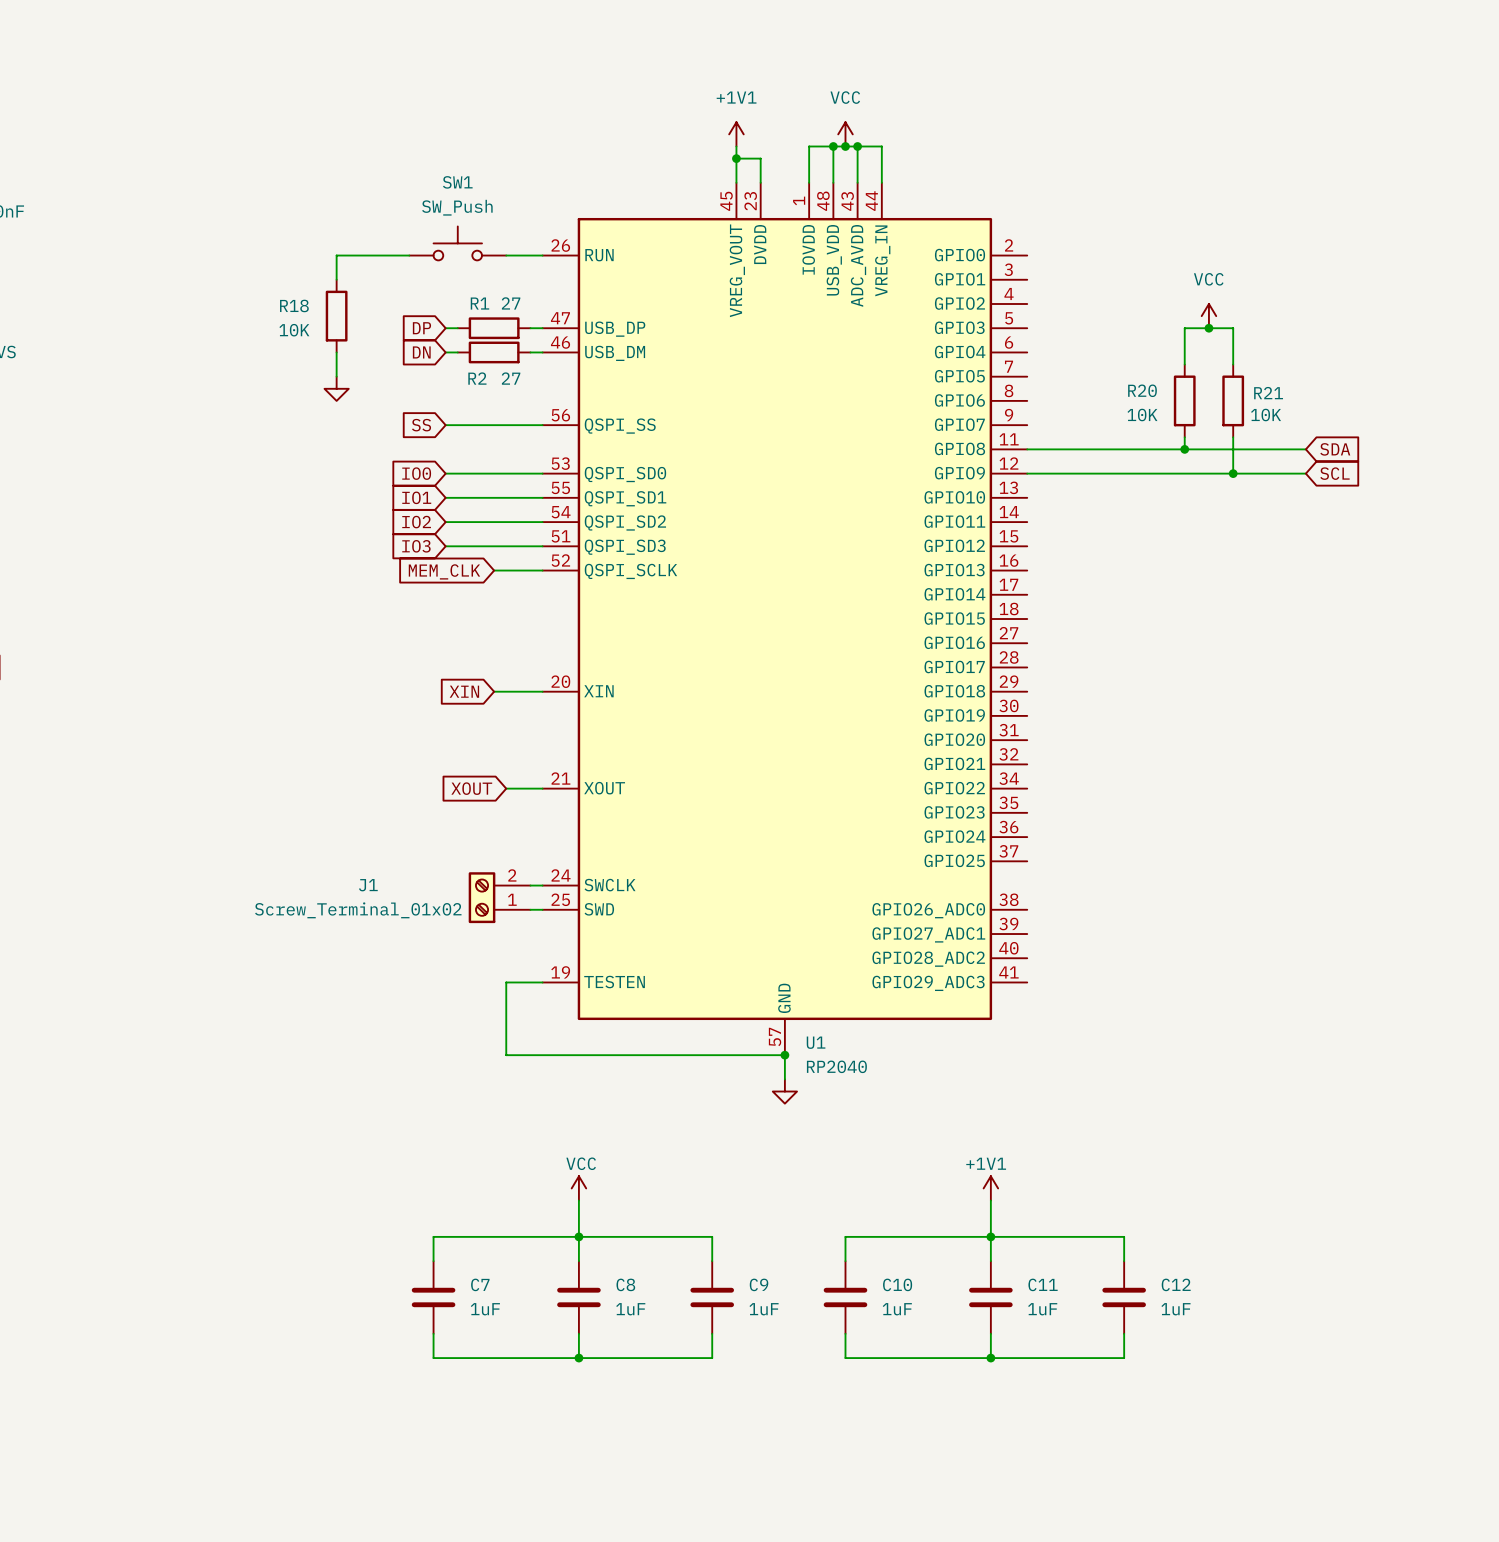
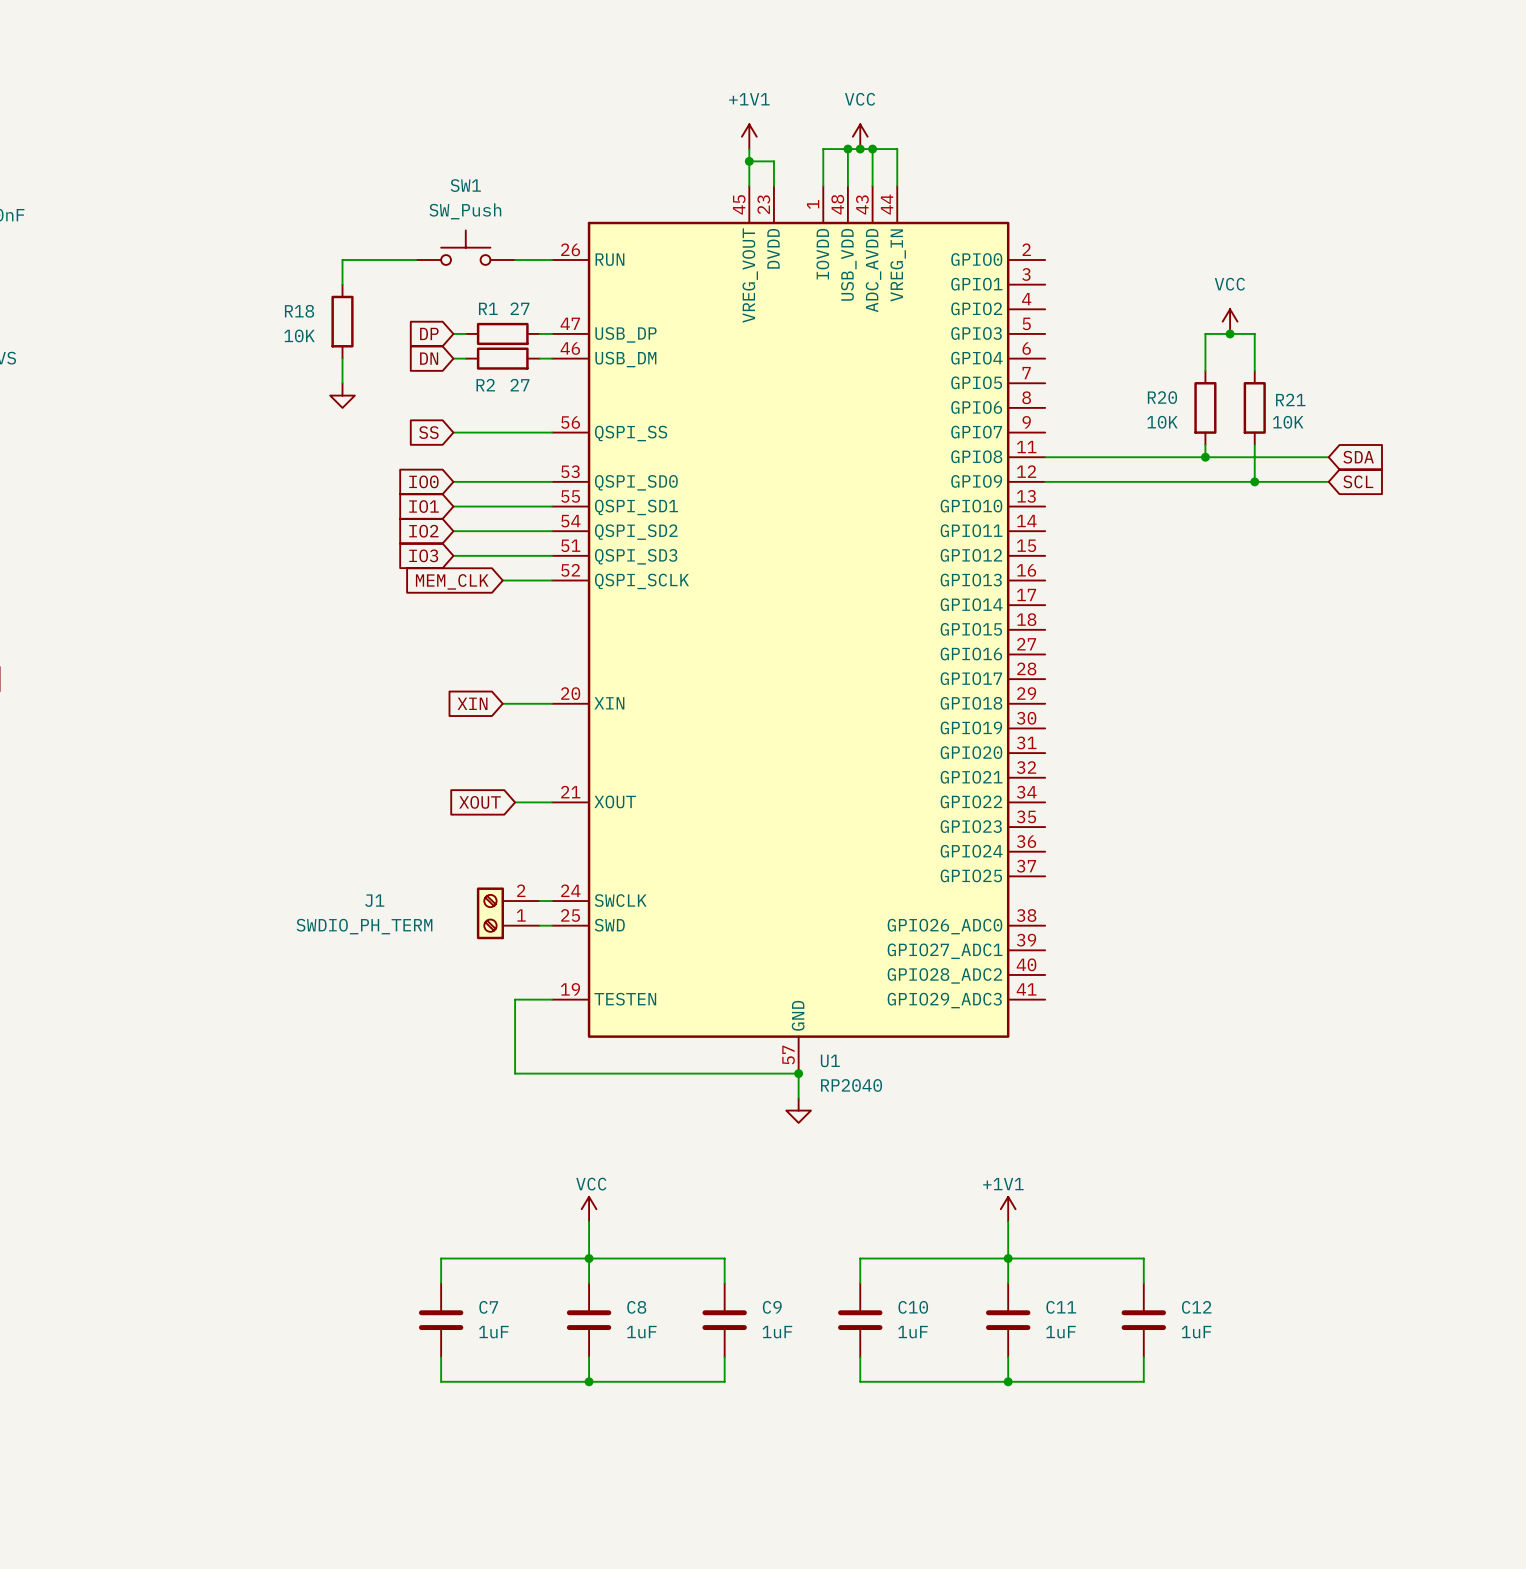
J1 value: Screw_Terminal_01x02 (358, 910) -> SWDIO_PH_TERM (364, 926)

